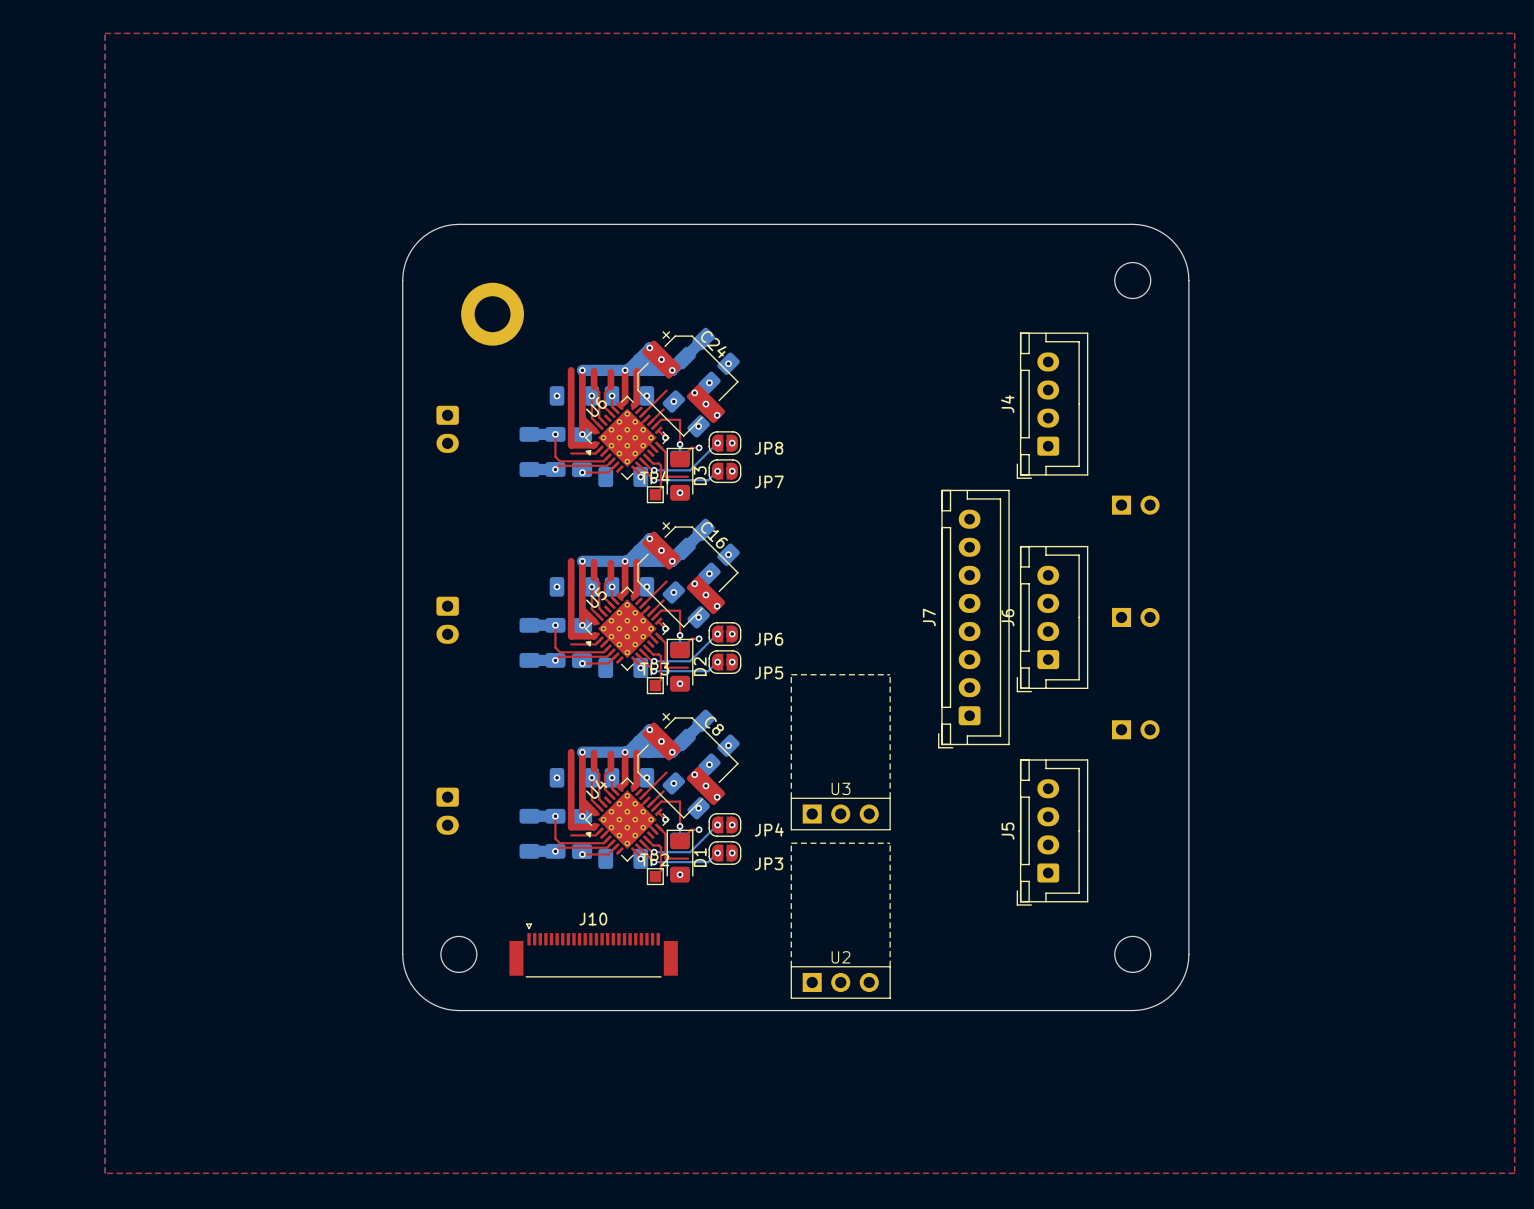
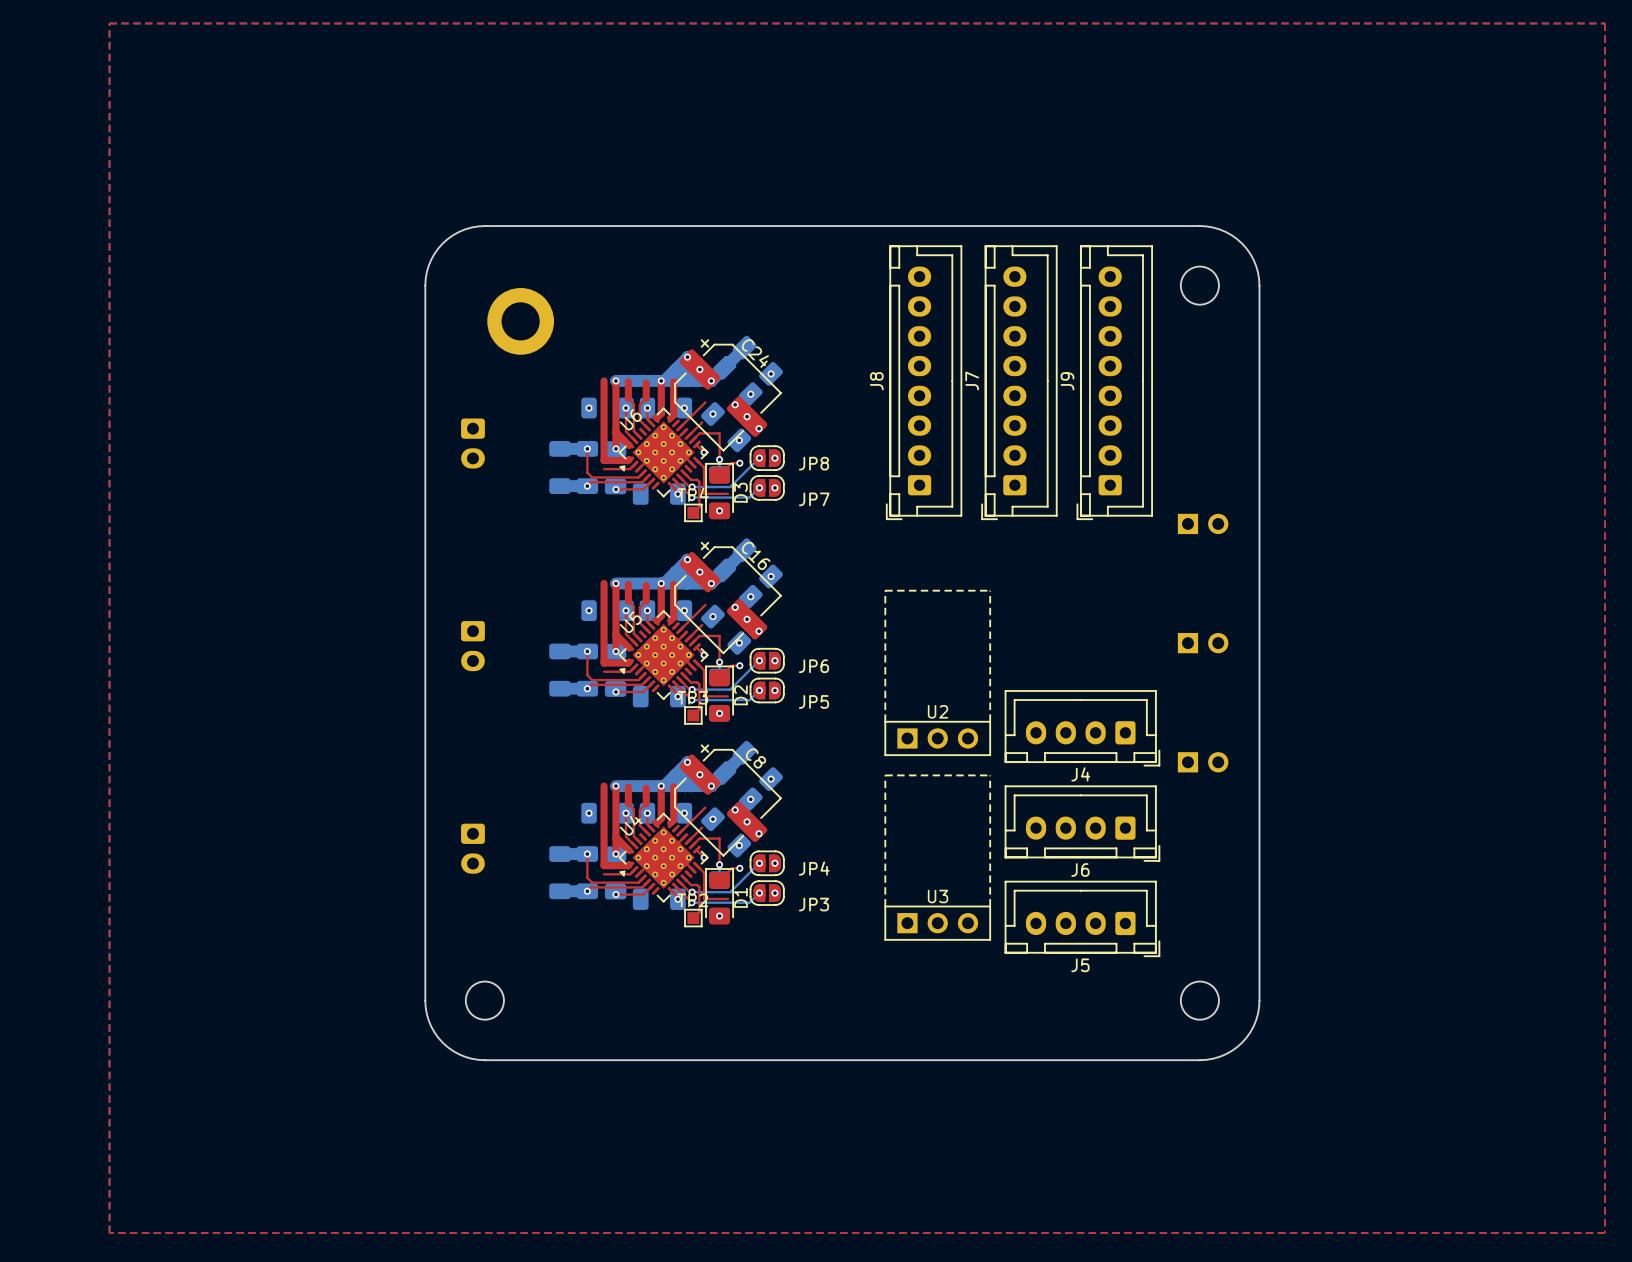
J8: none -> (924, 382)
J9: none -> (1114, 382)
J4 rotation: 0° (1052, 405) -> 90° counterclockwise (1082, 728)
J4 position: (1052, 405) -> (1082, 728)
J7 position: (973, 619) -> (1019, 382)
J6 rotation: 0° (1052, 619) -> 90° counterclockwise (1082, 823)
J6 position: (1052, 619) -> (1082, 823)
U3 position: (840, 752) -> (937, 857)
J5 rotation: 0° (1052, 832) -> 90° counterclockwise (1082, 918)
U2 position: (840, 920) -> (937, 672)
J10: (593, 950) -> none

